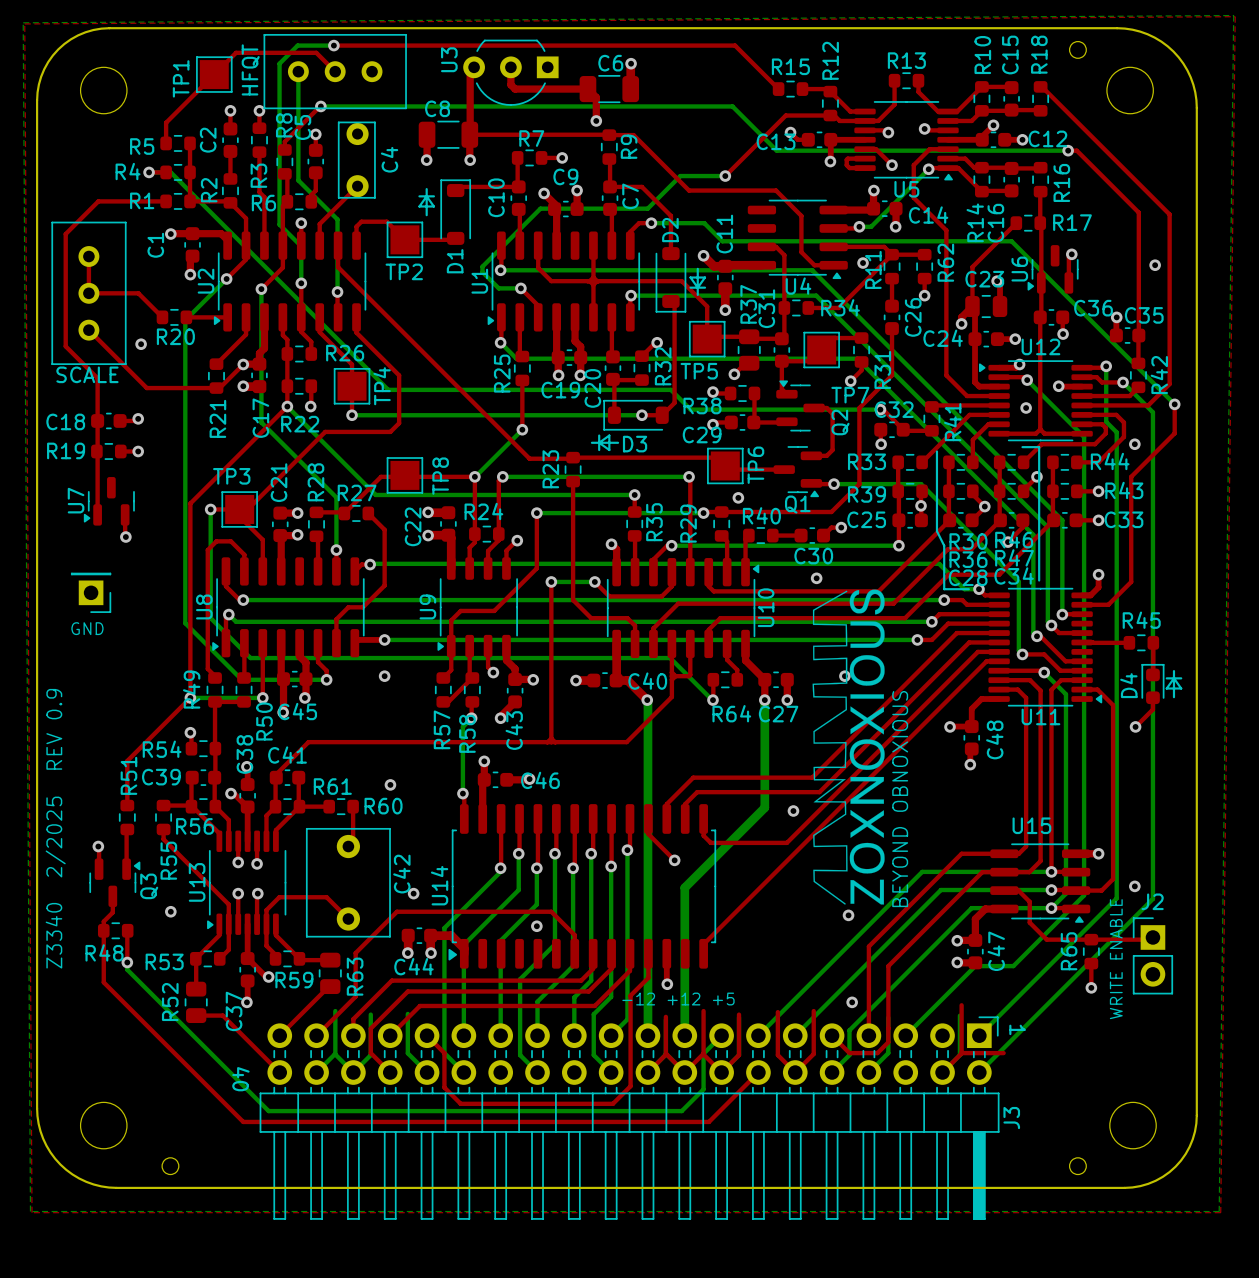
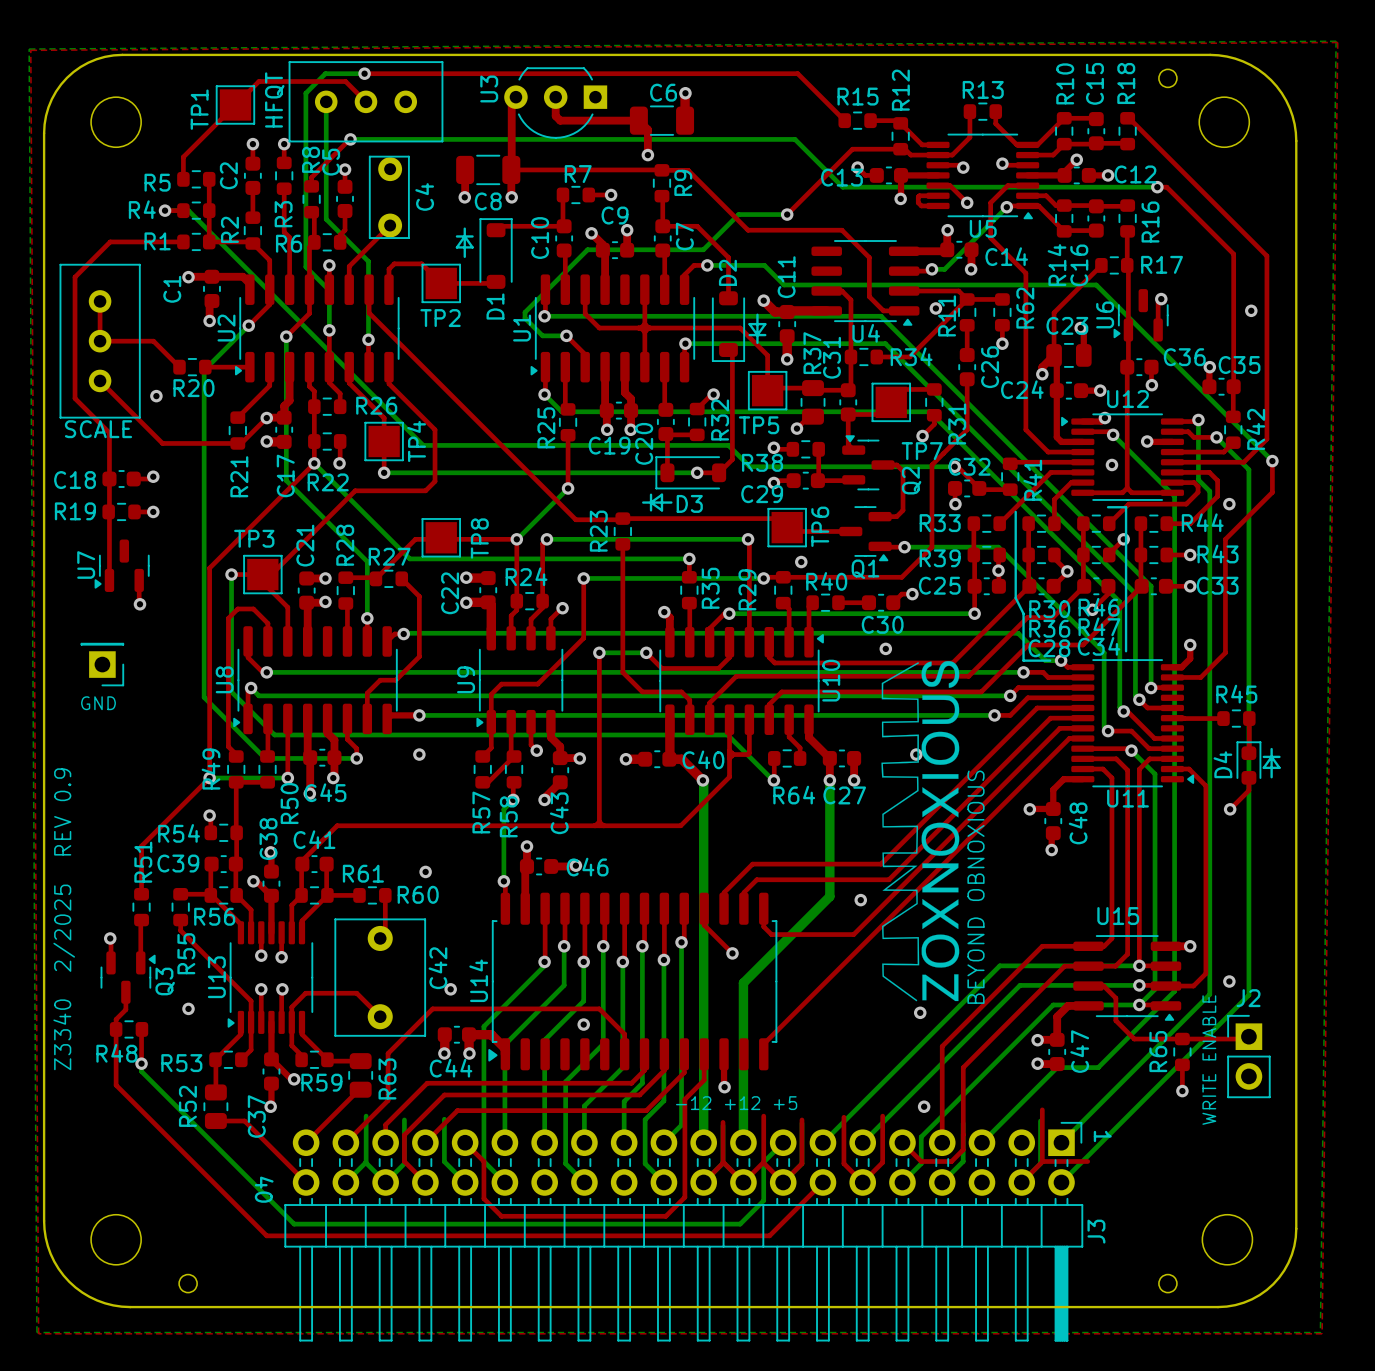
C8 name position: C8 (437, 108) -> C8 (488, 201)

